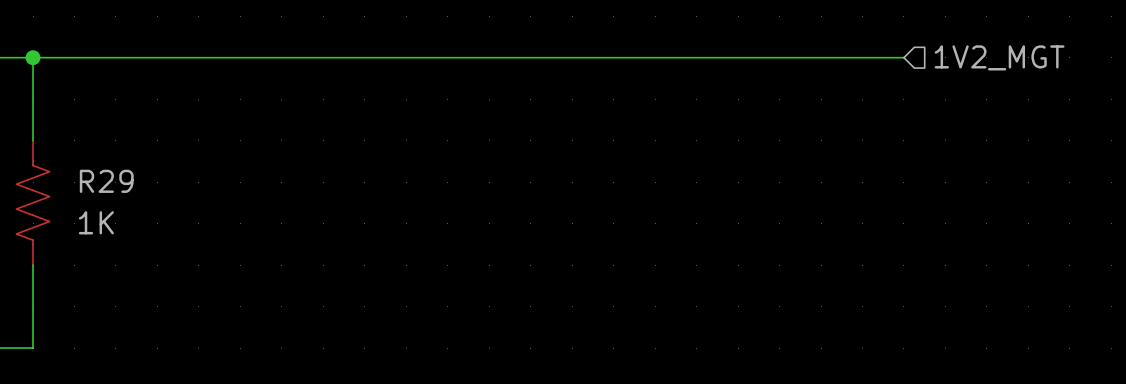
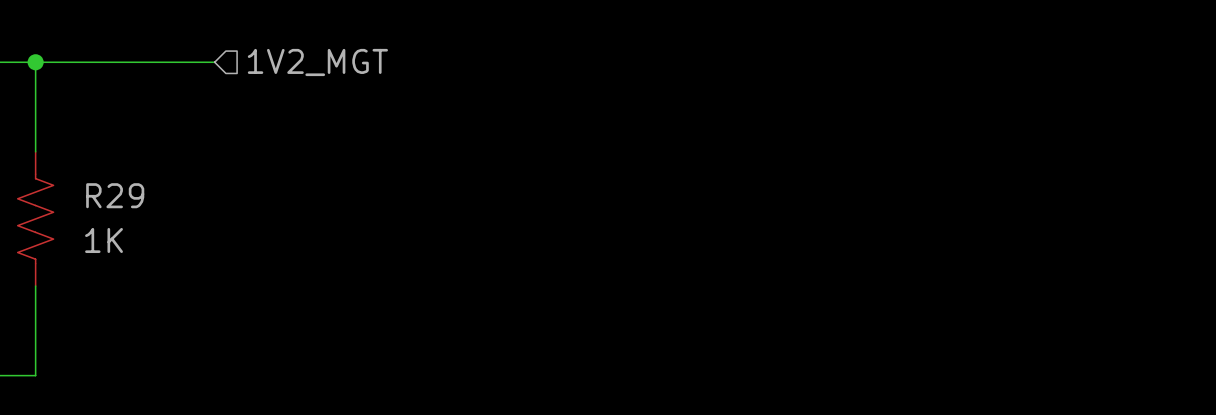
wire: (198, 57) (903, 57) -> none
hierarchical label: none -> 1V2_MGT (317, 62)
hierarchical label: 1V2_MGT (999, 57) -> none

